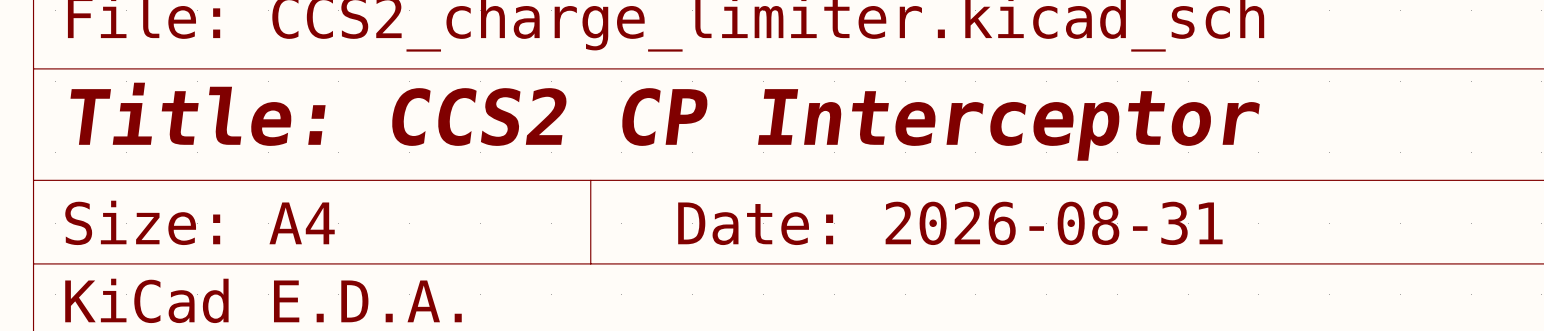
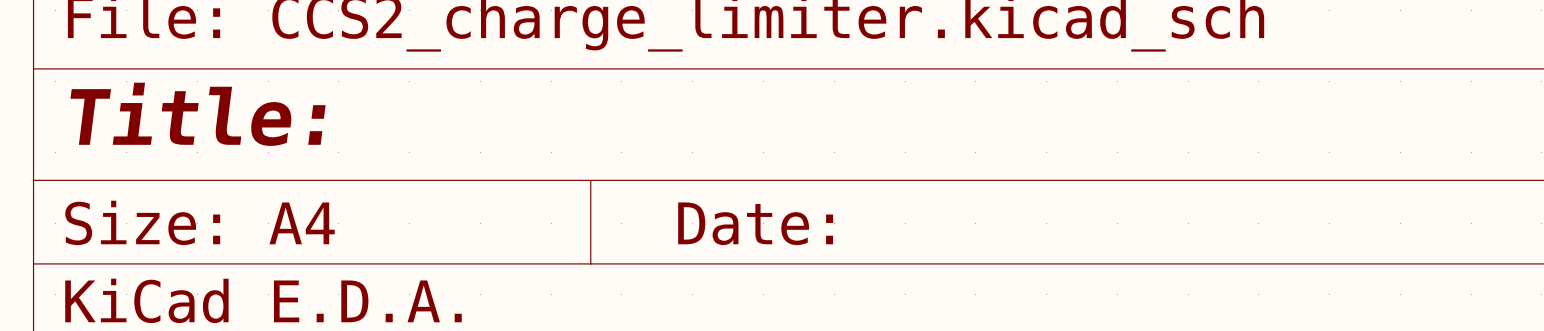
title block: Title: CCS2 CP Interceptor (665, 121) -> Title: (198, 114)
title block: Date: 2026-08-31 (950, 223) -> Date: (755, 223)

